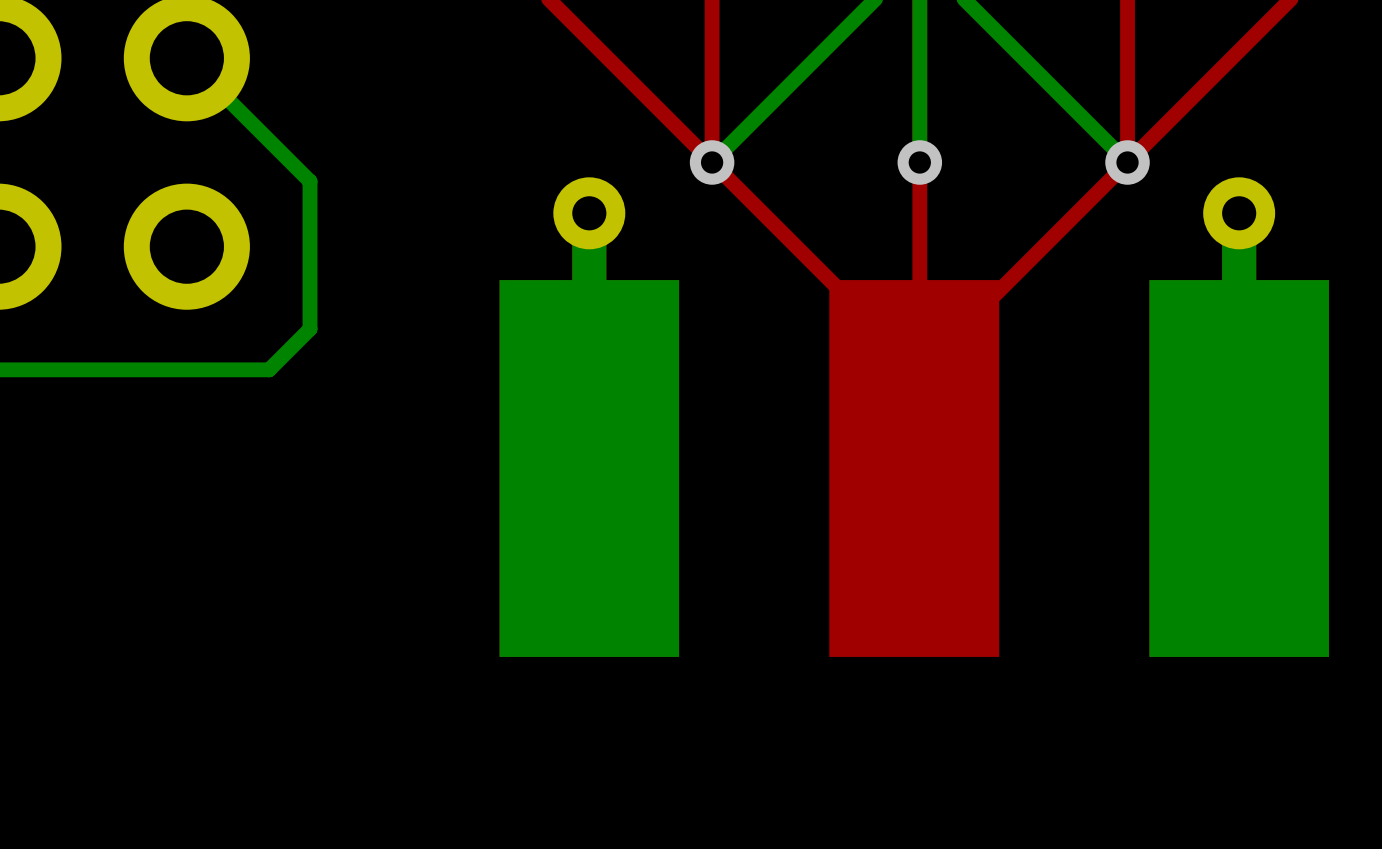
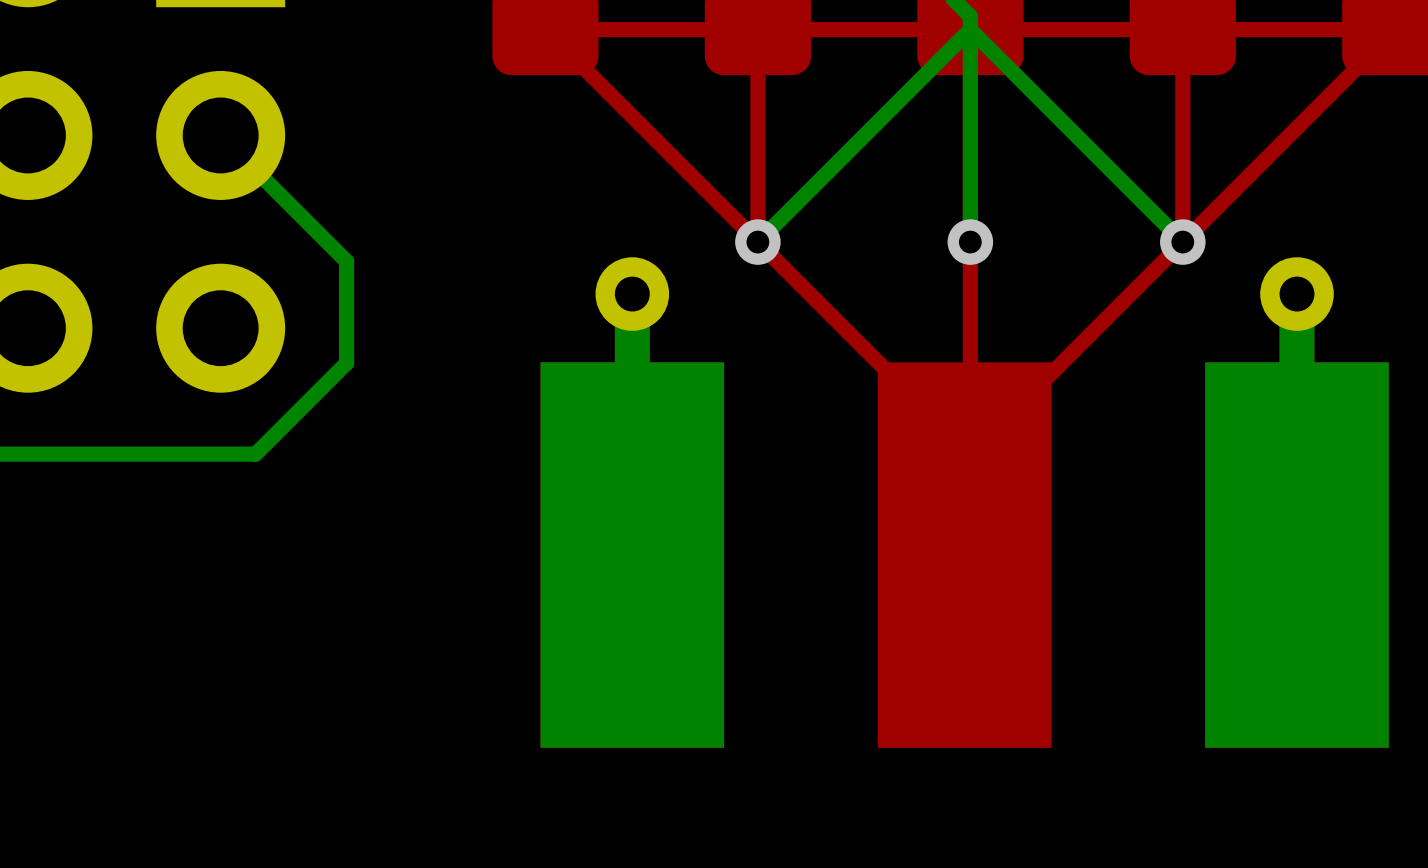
bottom track: (310, 280) (310, 329) (269, 369) (220, 369) -> (346, 363) (255, 454)

